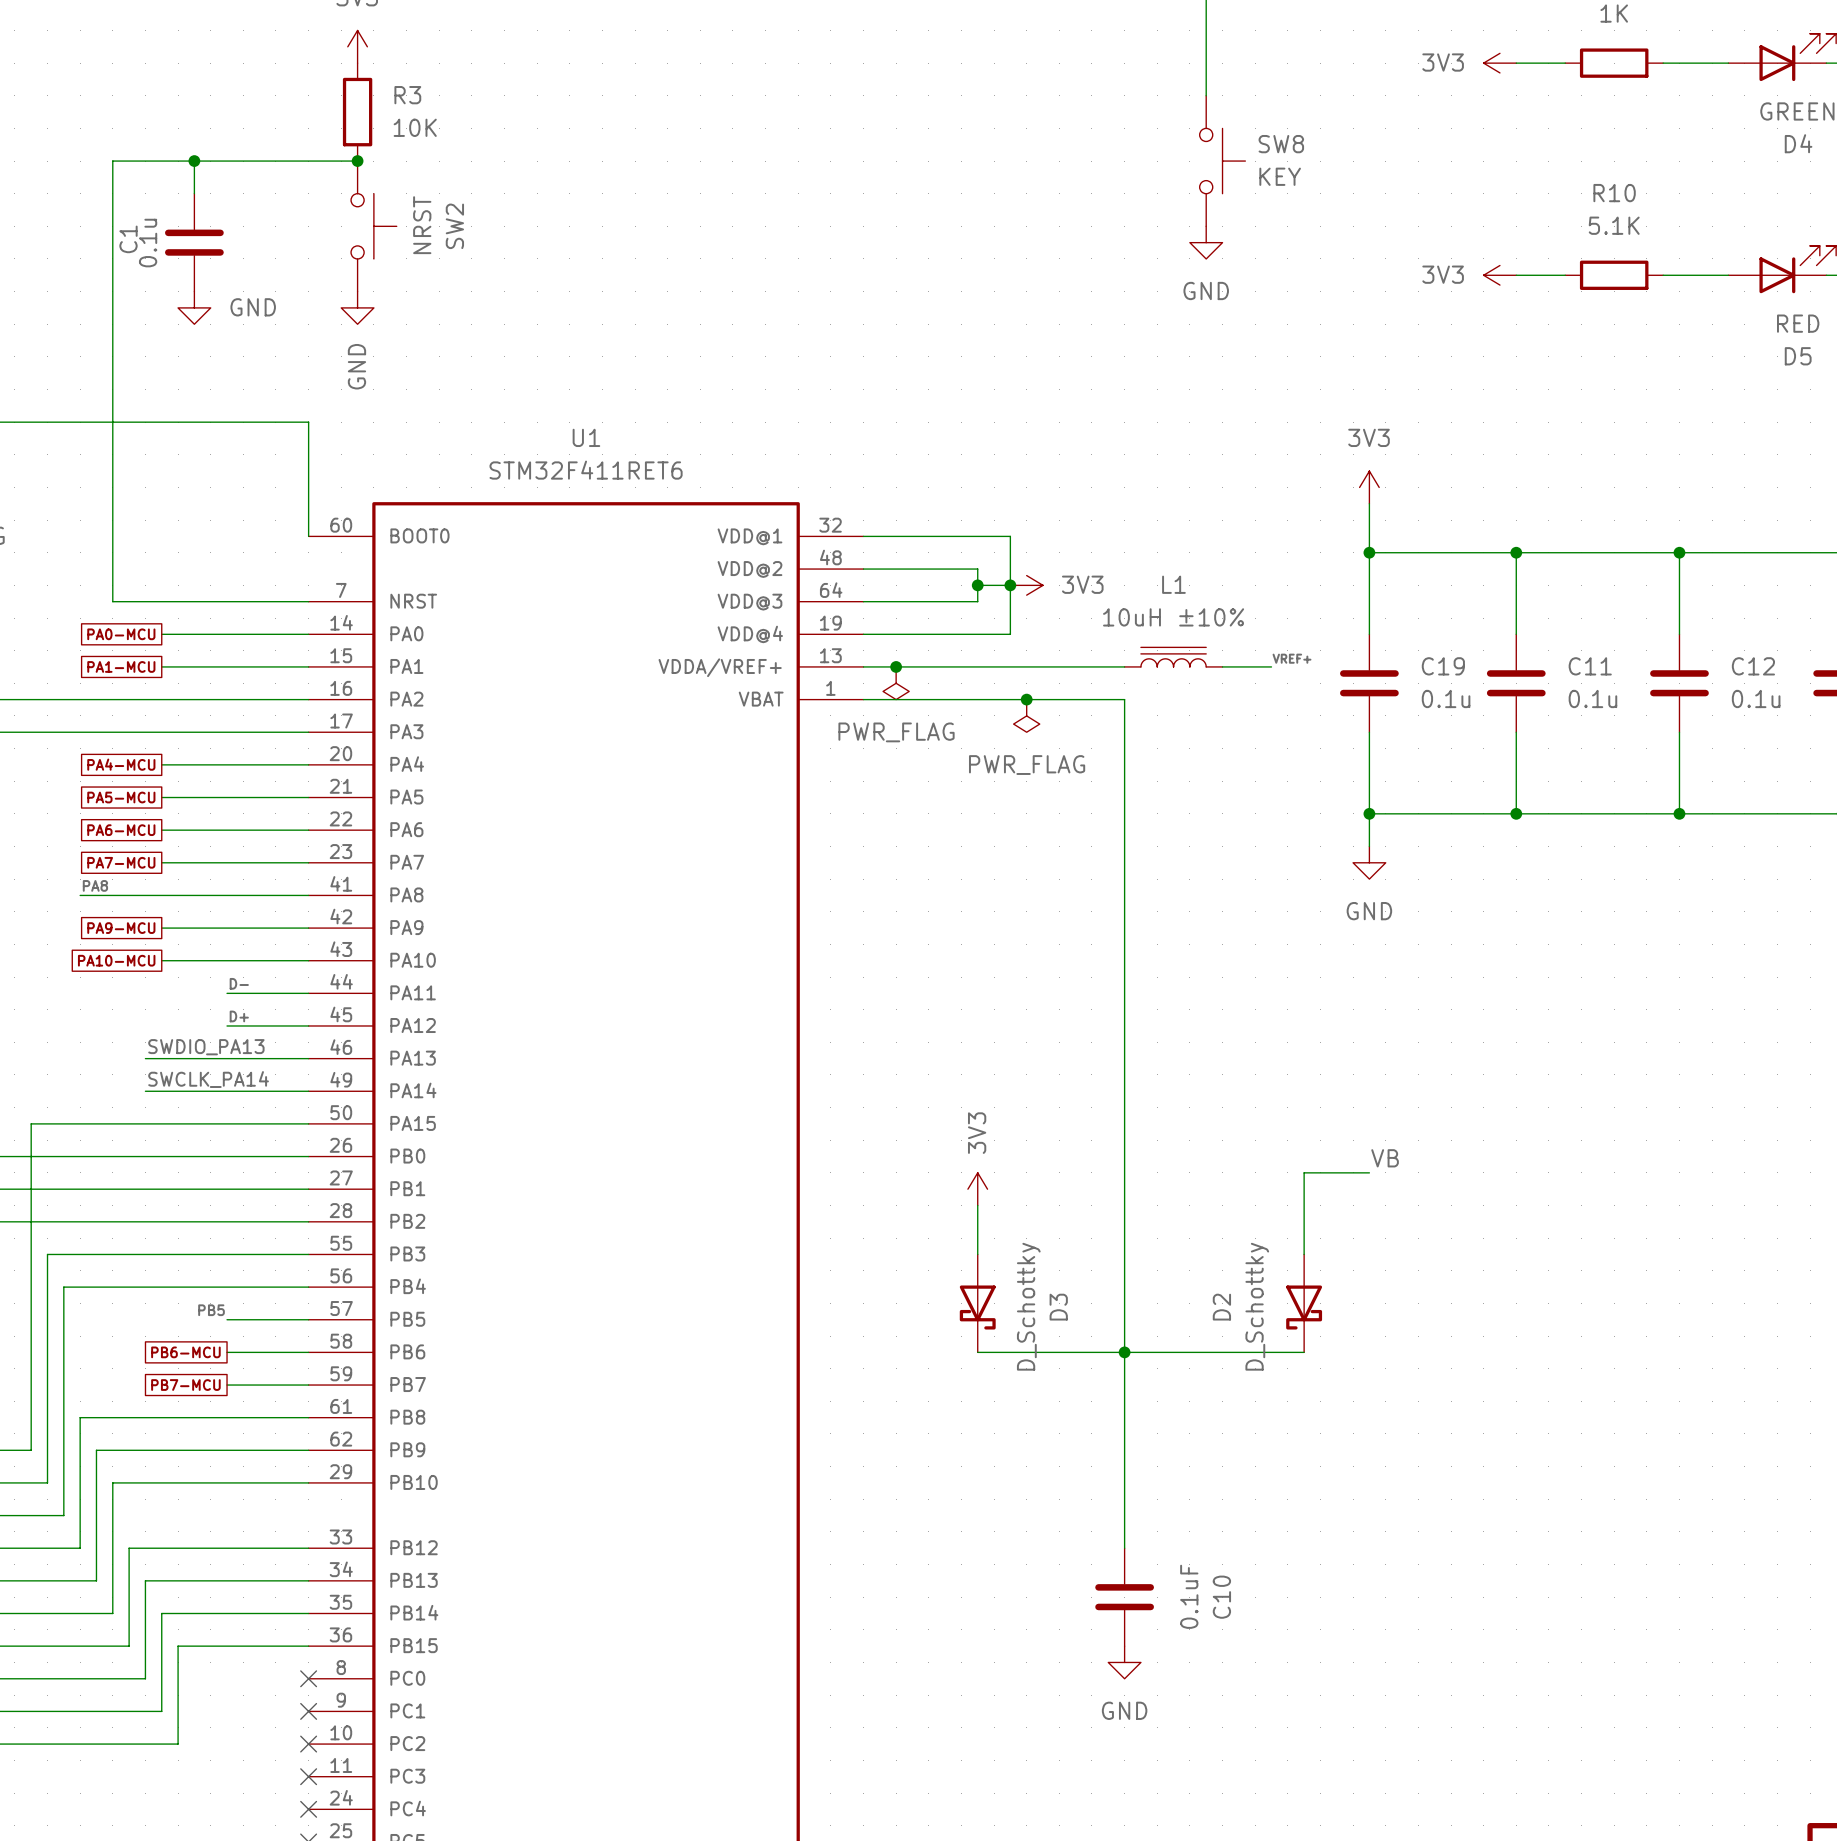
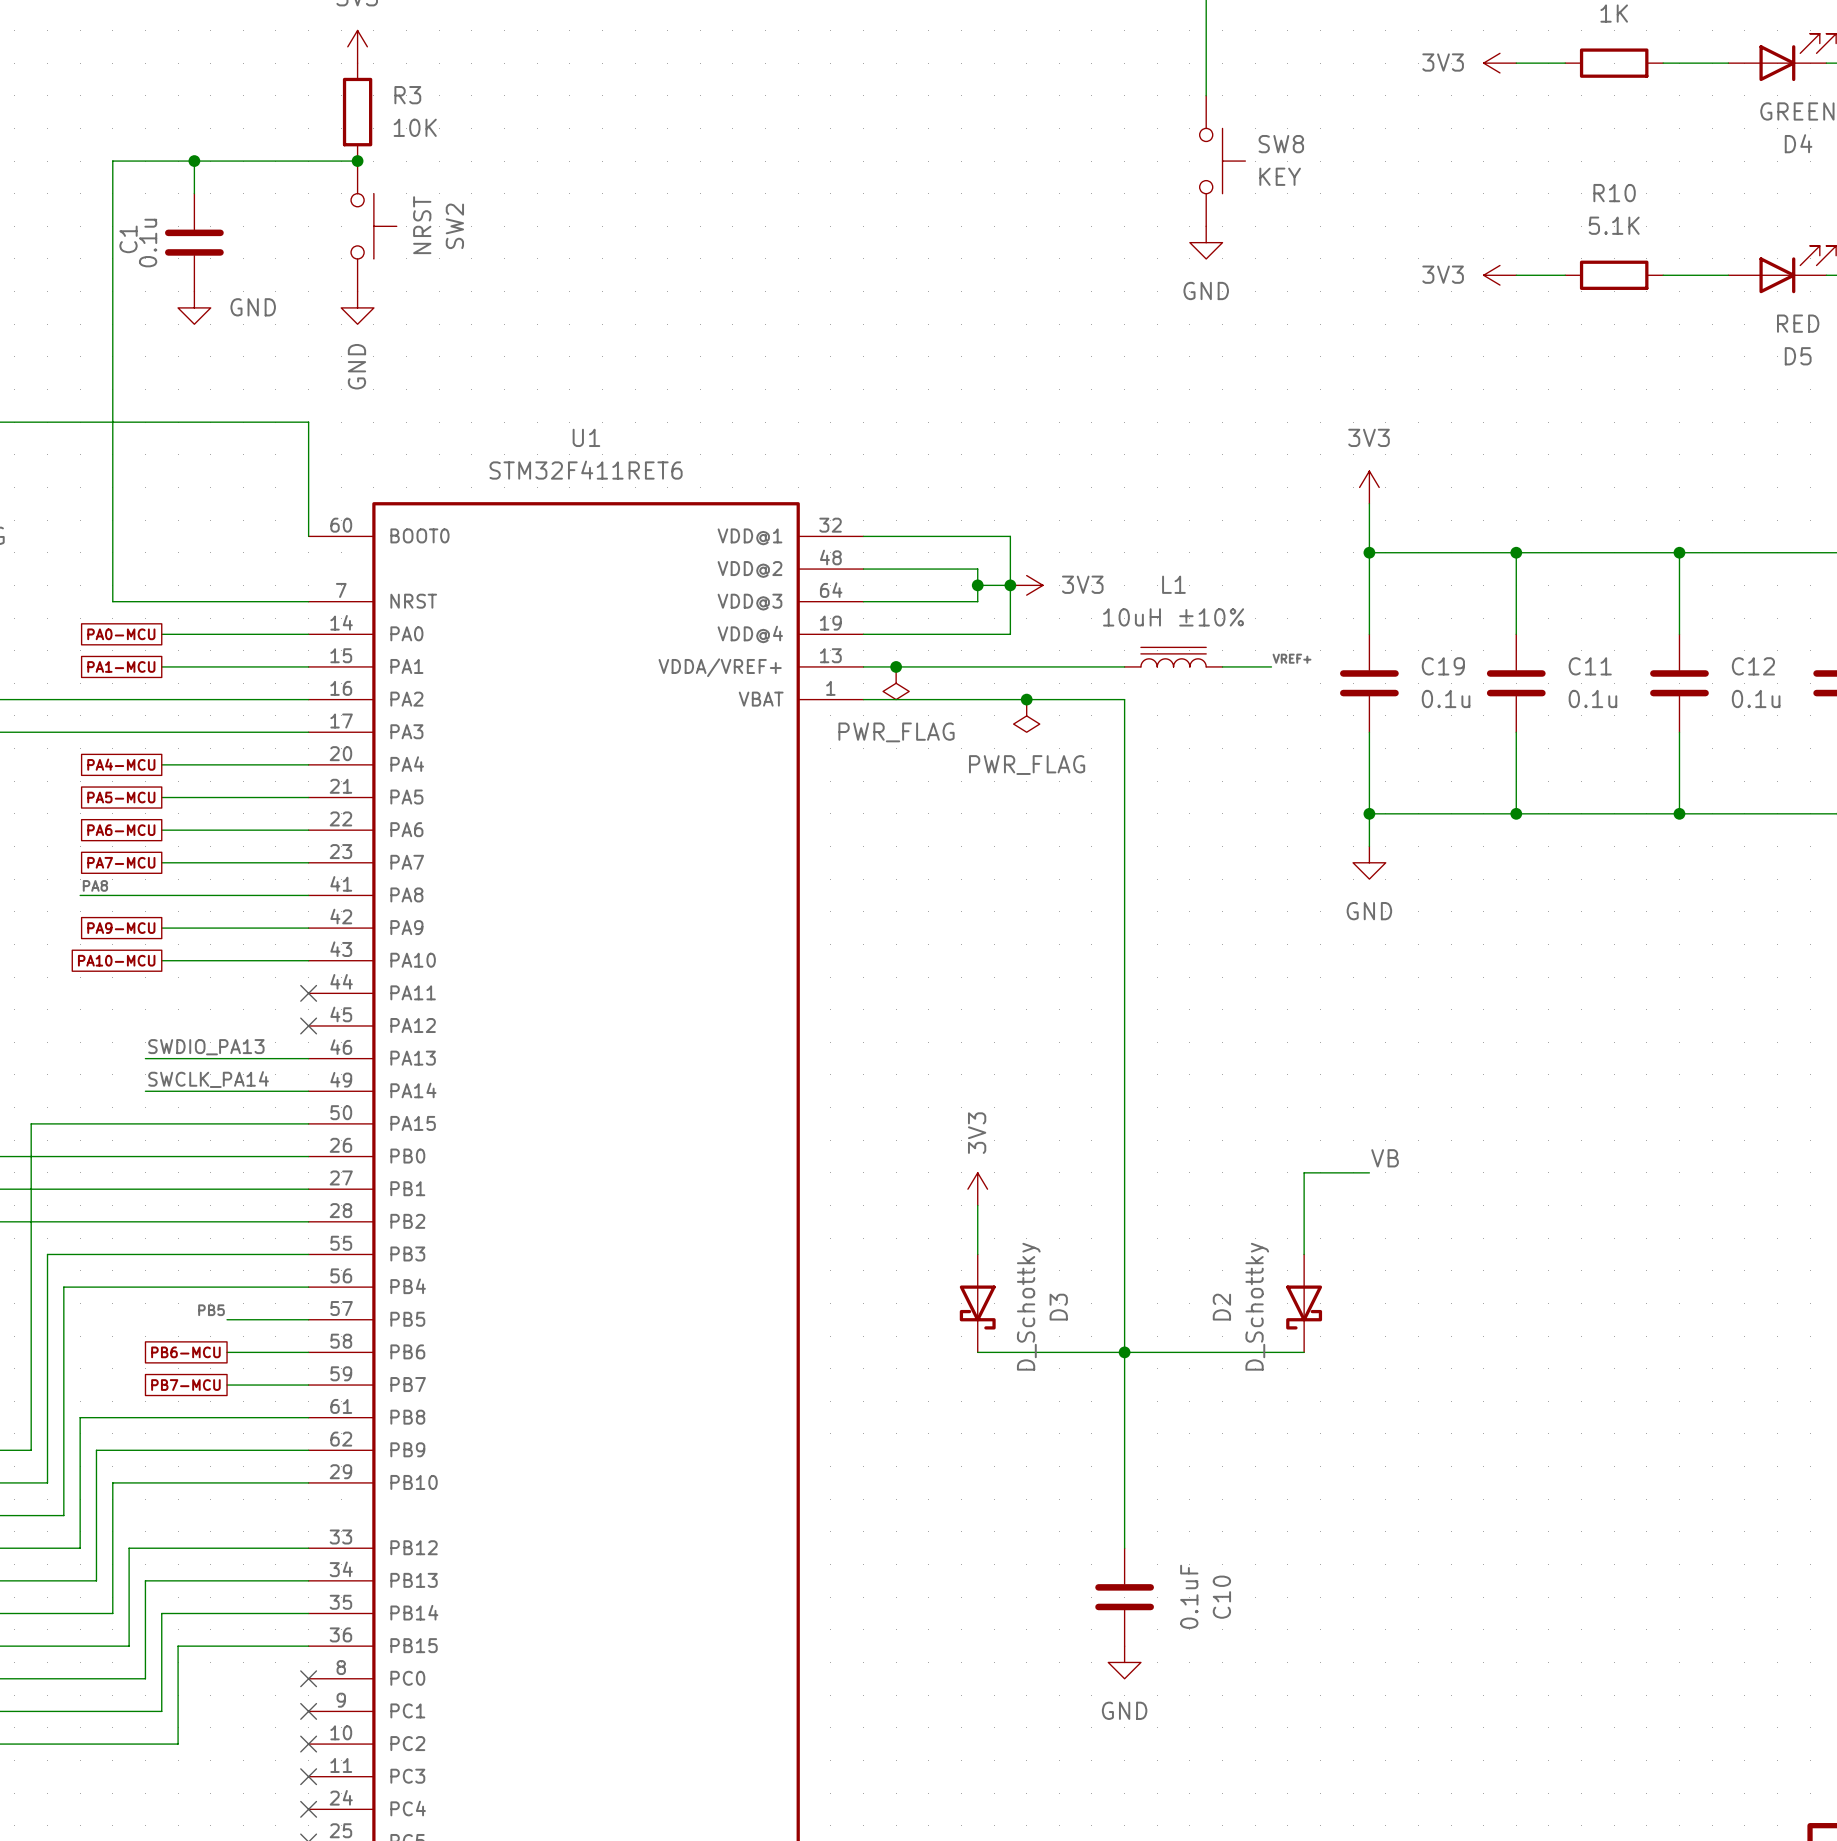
label: D- (239, 983) -> none
wire: (227, 993) (308, 993) -> none
no-connect mark: none -> (308, 993)
label: D+ (239, 1016) -> none
wire: (227, 1025) (308, 1025) -> none
no-connect mark: none -> (308, 1025)

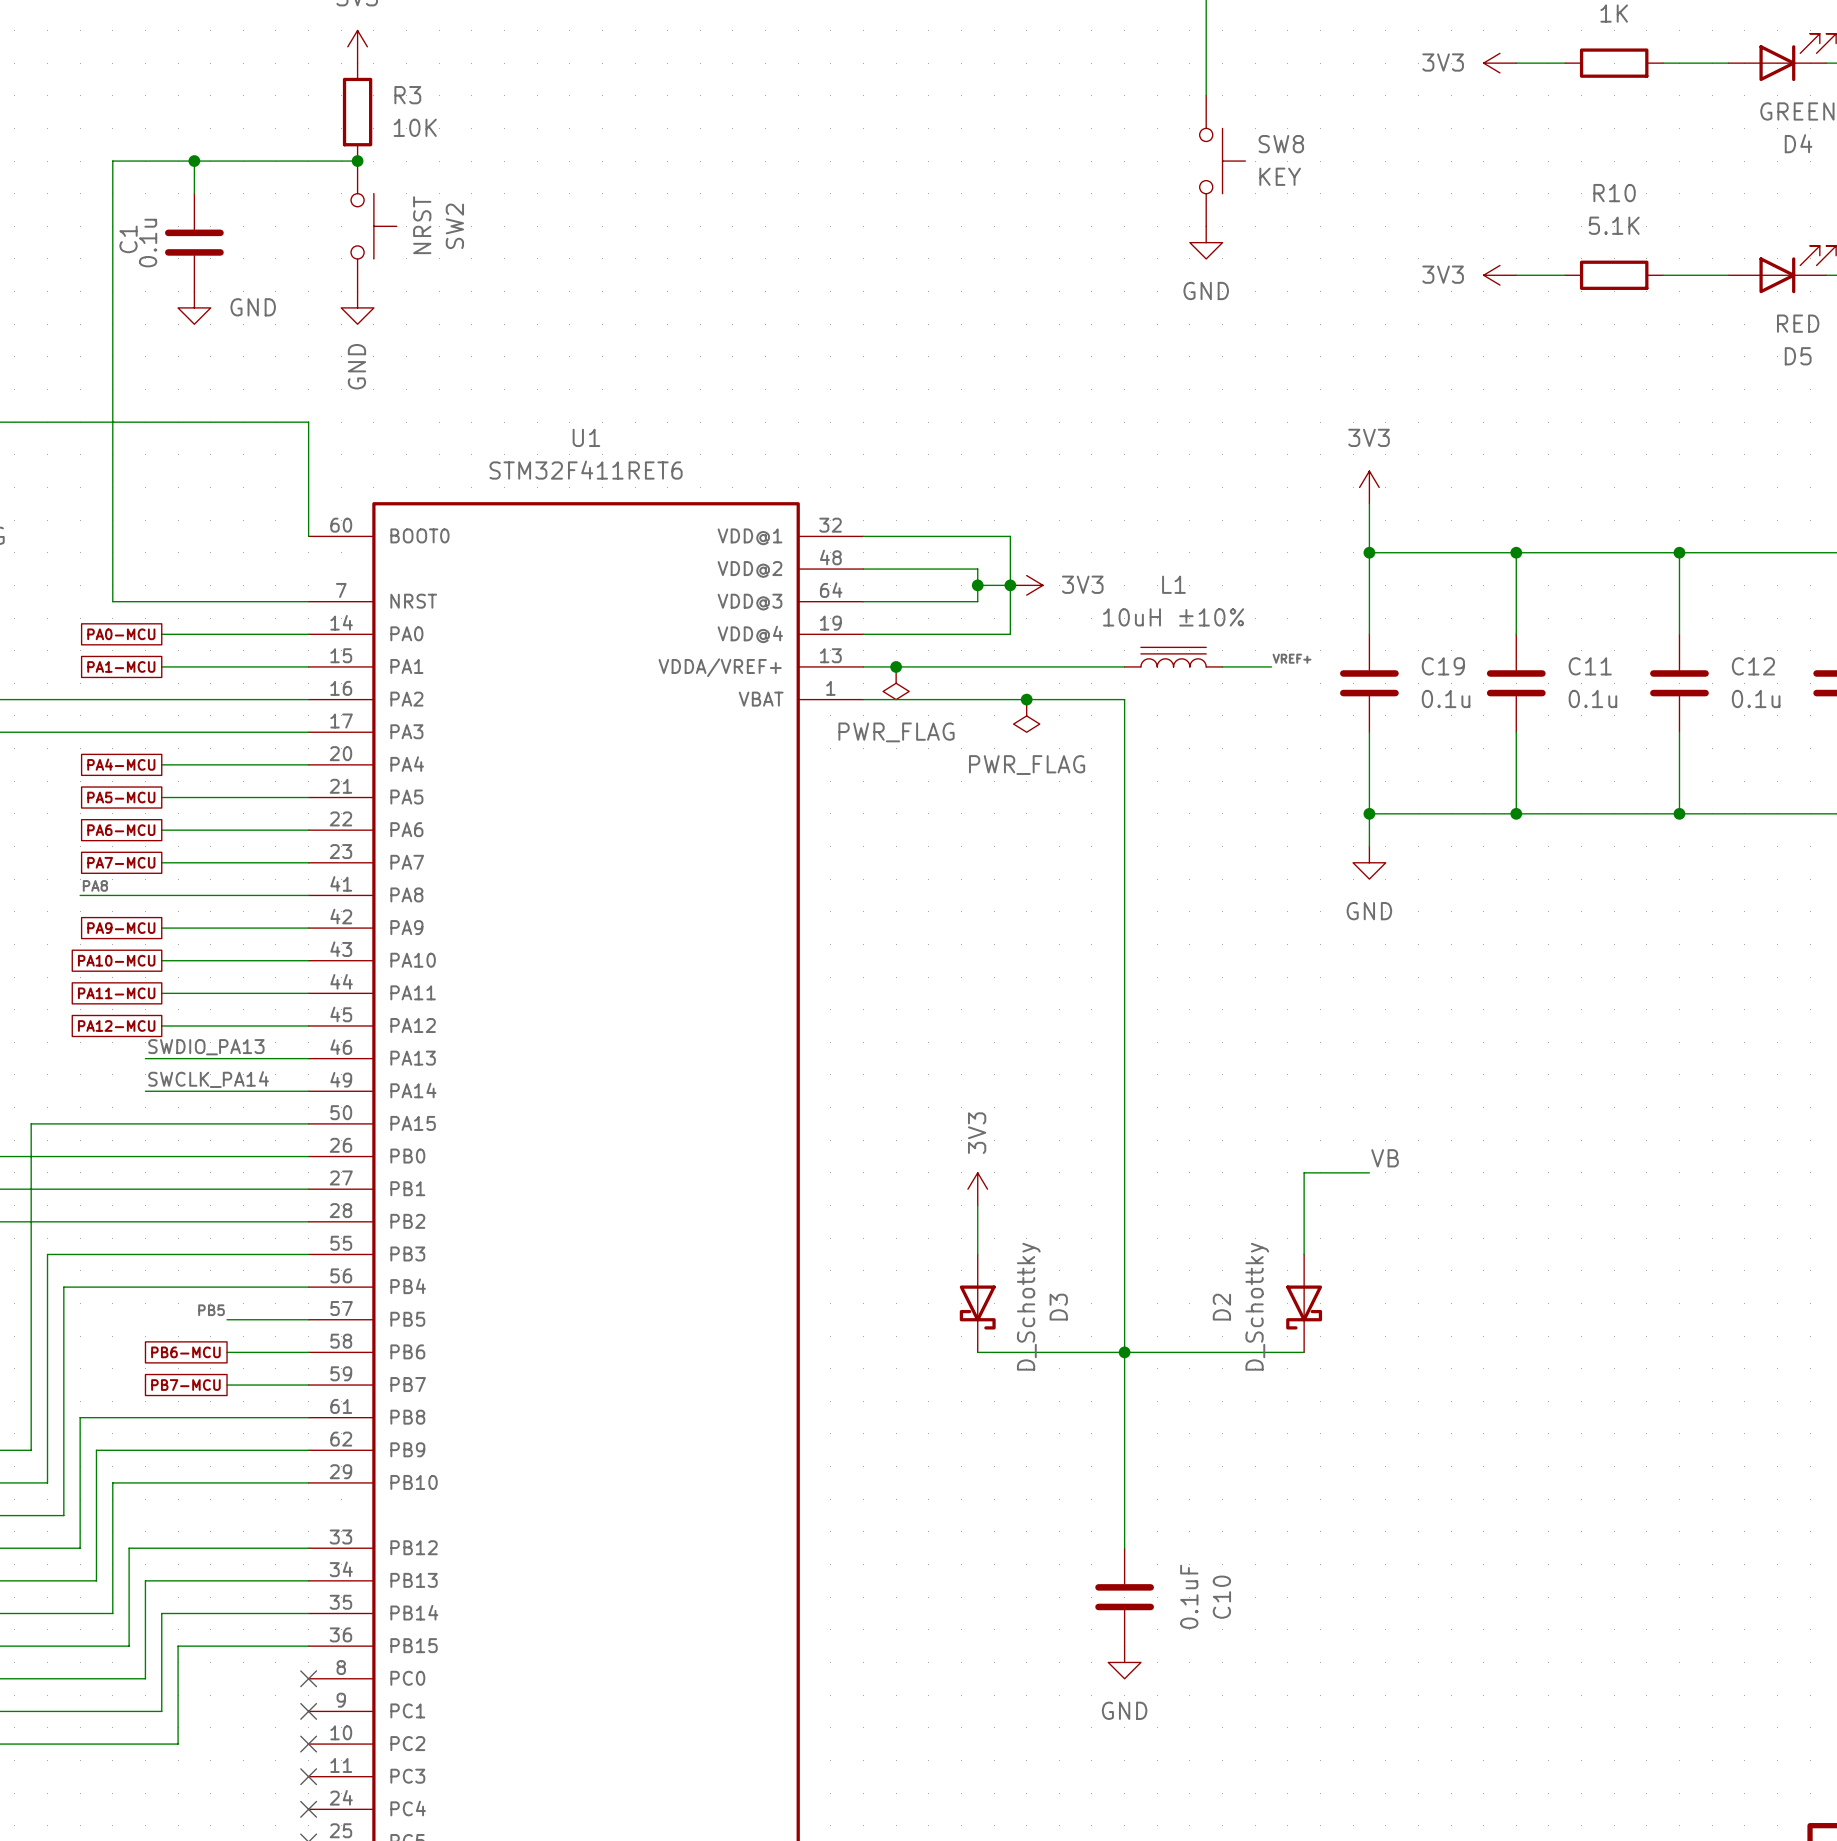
global label: none -> PA11-MCU (116, 993)
wire: none -> (161, 993) (308, 993)
no-connect mark: (308, 993) -> none
global label: none -> PA12-MCU (116, 1025)
wire: none -> (161, 1025) (308, 1025)
no-connect mark: (308, 1025) -> none

